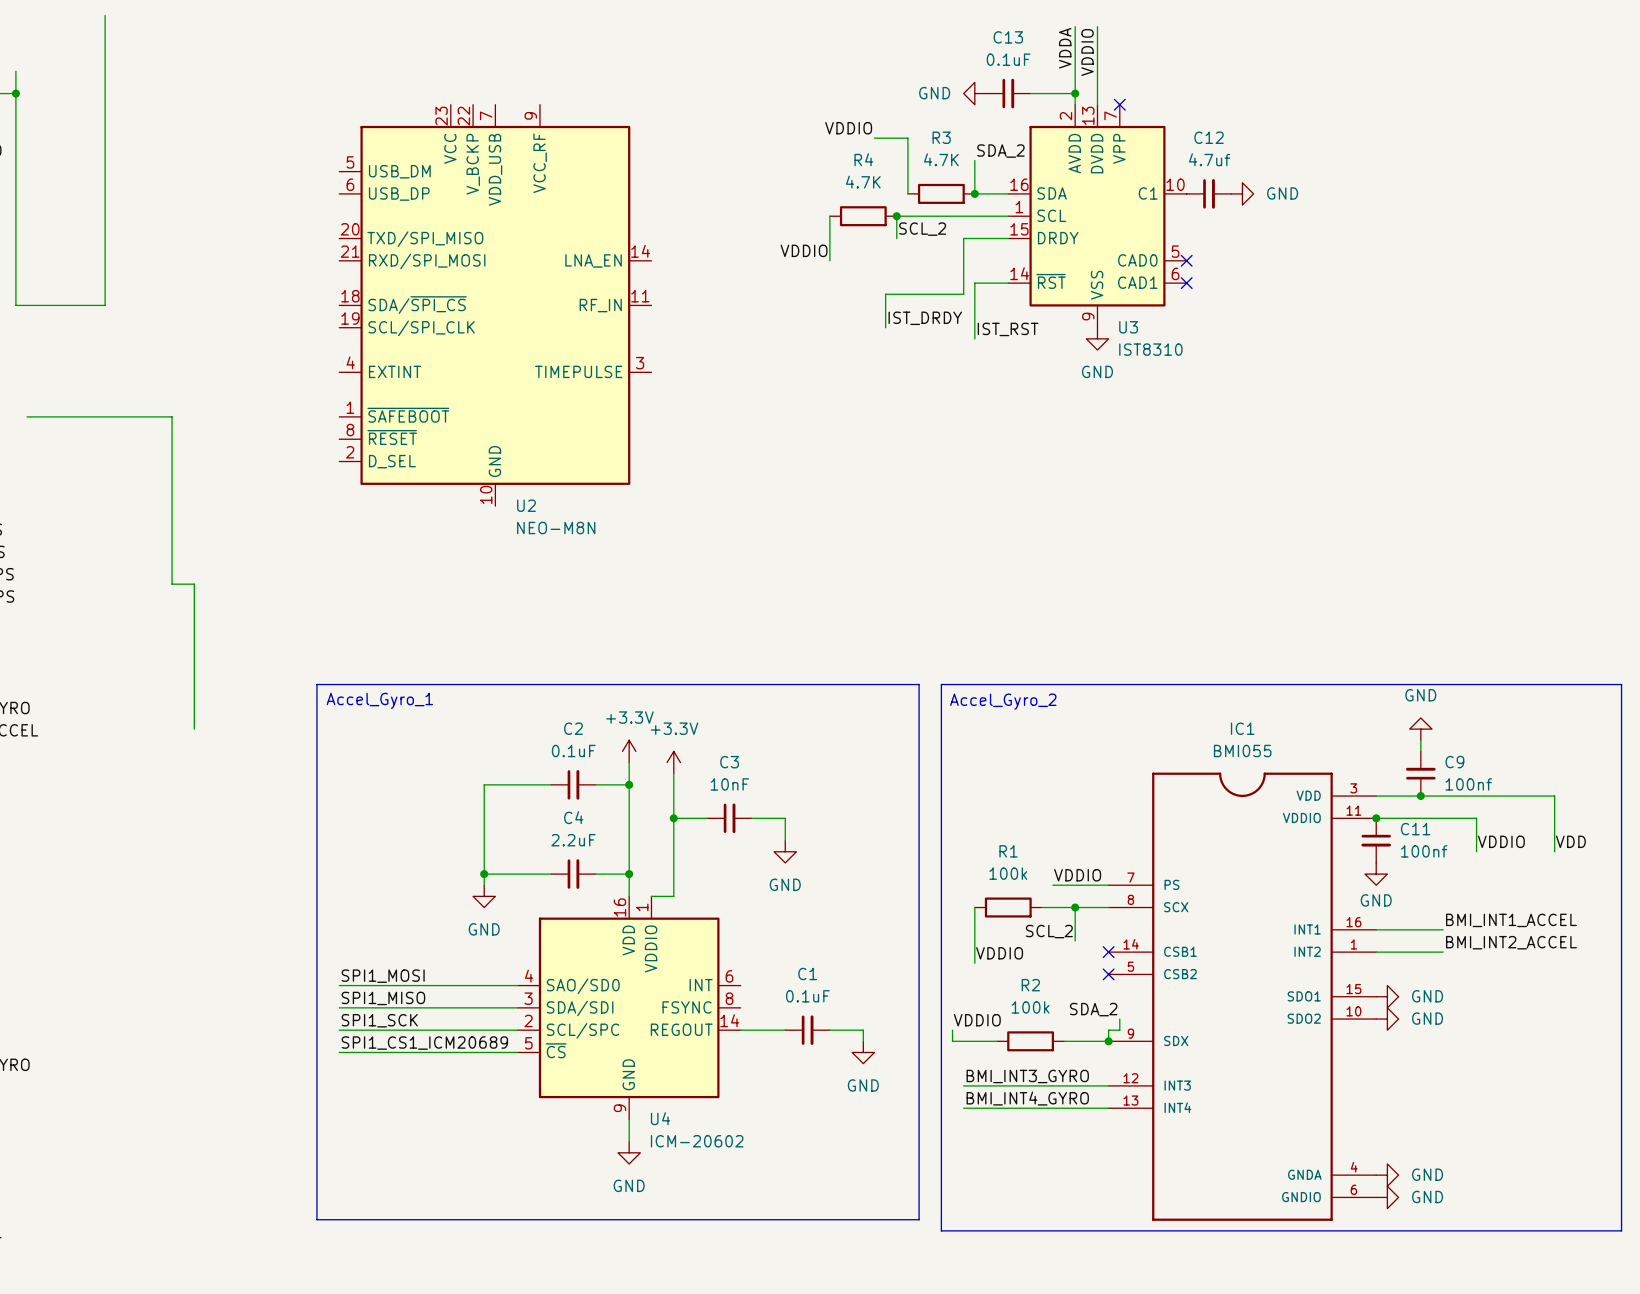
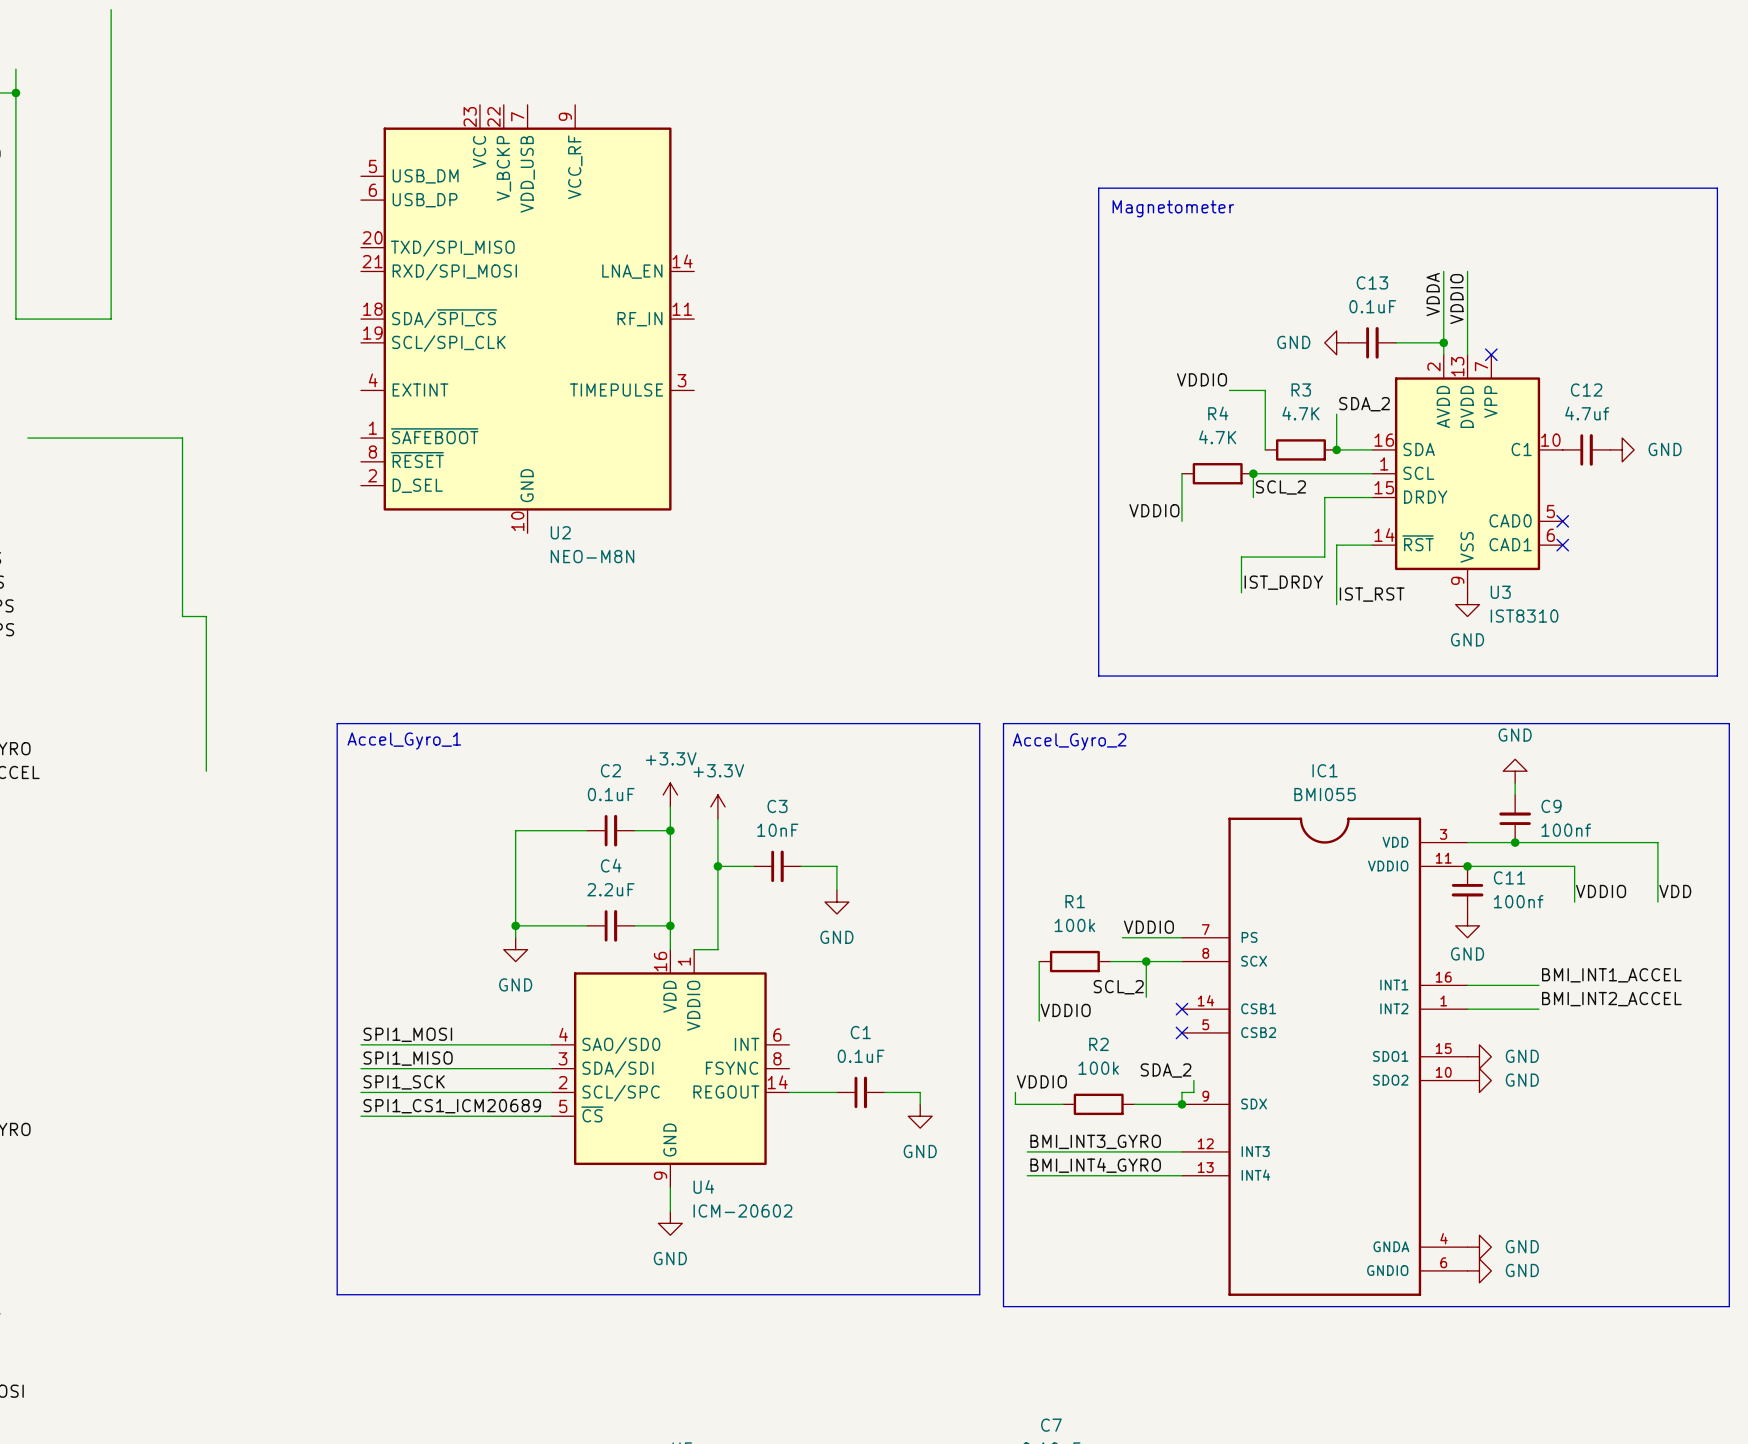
wire: (1075, 26) (1075, 104) -> none
wire: (1097, 26) (1097, 104) -> none
label: VDDA (1065, 48) -> none
label: VDDIO (1087, 52) -> none
power symbol: GND (974, 93) -> none
C13 position: (1008, 93) -> (1372, 342)
wire: (1030, 93) (1075, 93) -> none
junction: (1075, 93) -> none
no-connect mark: (1119, 104) -> none
label: VDDIO (848, 128) -> none
wire: (874, 138) (907, 138) (907, 193) -> none
label: SDA_2 (1000, 151) -> none
wire: (974, 160) (974, 193) (1008, 193) -> none
line: none -> (1098, 188) (1717, 188) (1717, 676) (1098, 676) (1098, 188)
R3 position: (941, 193) -> (1300, 449)
junction: (974, 193) -> none
C12 position: (1208, 193) -> (1586, 449)
power symbol: GND (1242, 193) -> none
text: none -> Magnetometer (1173, 208)
wire: (829, 216) (829, 260) -> none
R4 position: (863, 216) -> (1217, 473)
junction: (896, 216) -> none
wire: (1008, 216) (896, 216) (896, 238) -> none
U3 position: (1097, 216) -> (1467, 473)
label: SCL_2 (922, 229) -> none
wire: (1008, 238) (963, 238) (963, 294) (885, 294) (885, 327) -> none
label: VDDIO (804, 250) -> none
no-connect mark: (1186, 260) -> none
wire: none -> (1443, 271) (1443, 354)
wire: none -> (1467, 271) (1467, 354)
label: none -> VDDA (1433, 294)
wire: (1008, 283) (974, 283) (974, 338) -> none
no-connect mark: (1186, 283) -> none
label: none -> VDDIO (1456, 299)
label: IST_DRDY (925, 318) -> none
power symbol: none -> GND (1336, 342)
wire: none -> (1396, 342) (1443, 342)
junction: none -> (1443, 342)
label: IST_RST (1008, 329) -> none
power symbol: GND (1097, 338) -> none
no-connect mark: none -> (1491, 354)
label: none -> VDDIO (1202, 379)
wire: none -> (1229, 390) (1265, 390) (1265, 449)
label: none -> SDA_2 (1364, 404)
wire: none -> (1336, 414) (1336, 449) (1372, 449)
junction: none -> (1336, 449)
power symbol: none -> GND (1622, 449)
wire: none -> (1181, 473) (1181, 521)
junction: none -> (1253, 473)
wire: none -> (1372, 473) (1253, 473) (1253, 497)
label: none -> SCL_2 (1280, 487)
wire: none -> (1372, 497) (1324, 497) (1324, 557) (1241, 557) (1241, 592)
label: none -> VDDIO (1154, 510)
no-connect mark: none -> (1562, 521)
wire: none -> (1372, 545) (1336, 545) (1336, 604)
no-connect mark: none -> (1562, 545)
label: none -> IST_DRDY (1283, 582)
label: none -> IST_RST (1372, 594)
power symbol: none -> GND (1467, 604)

